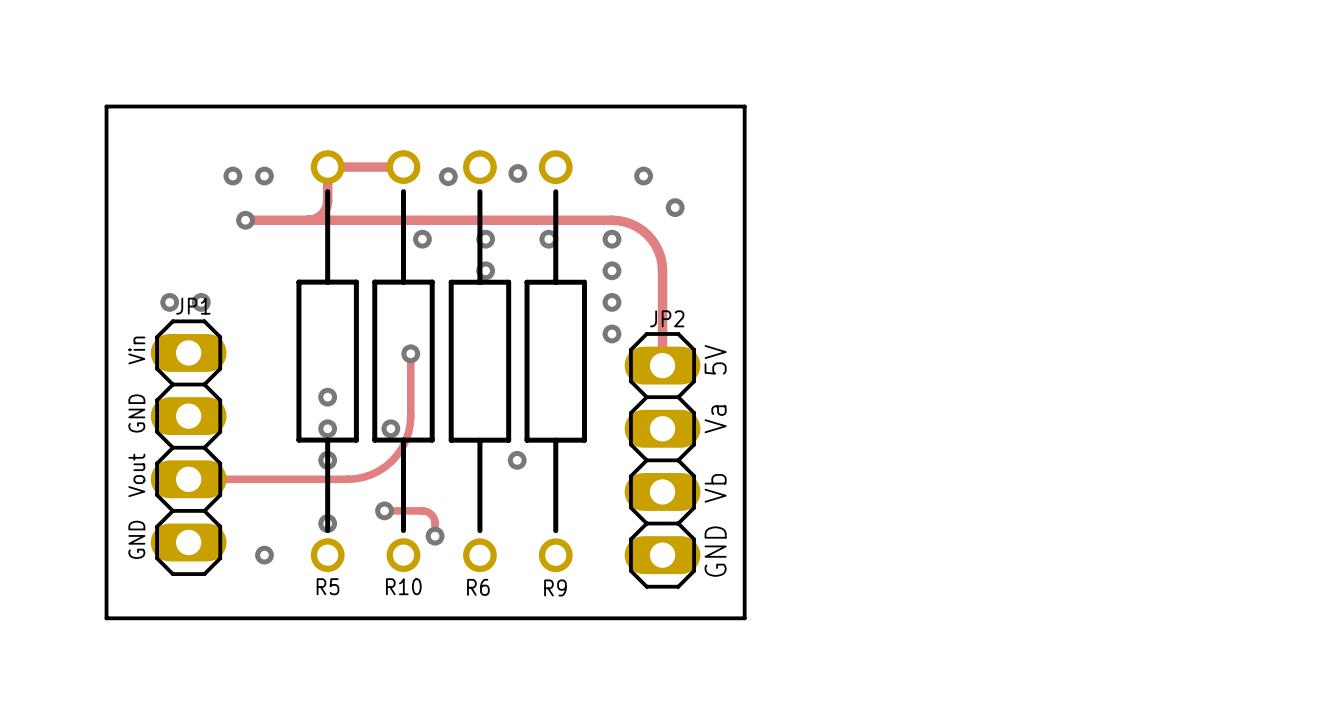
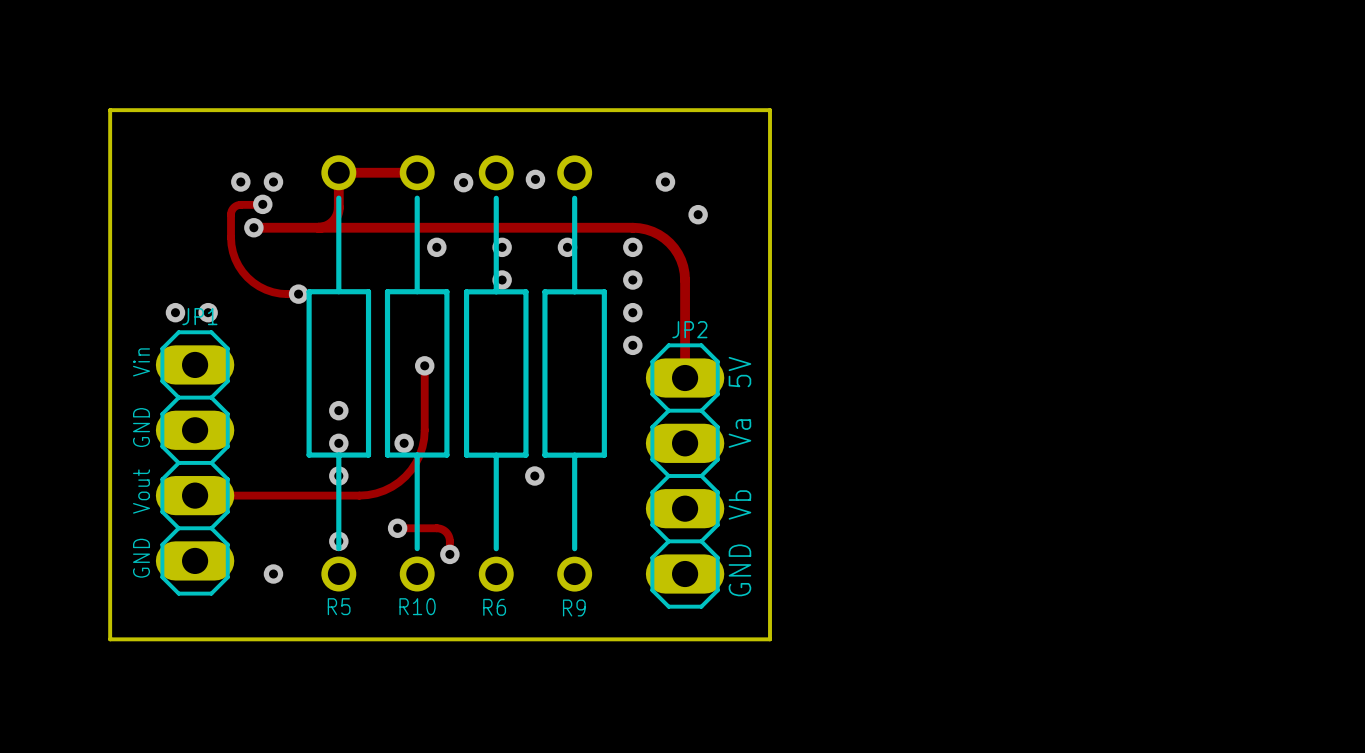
track: none -> (262, 204) (239, 204) (232, 209) (231, 237) (235, 259) (247, 277) (259, 286) (280, 293) (298, 294)
via: none -> (262, 204)
via: none -> (298, 294)

